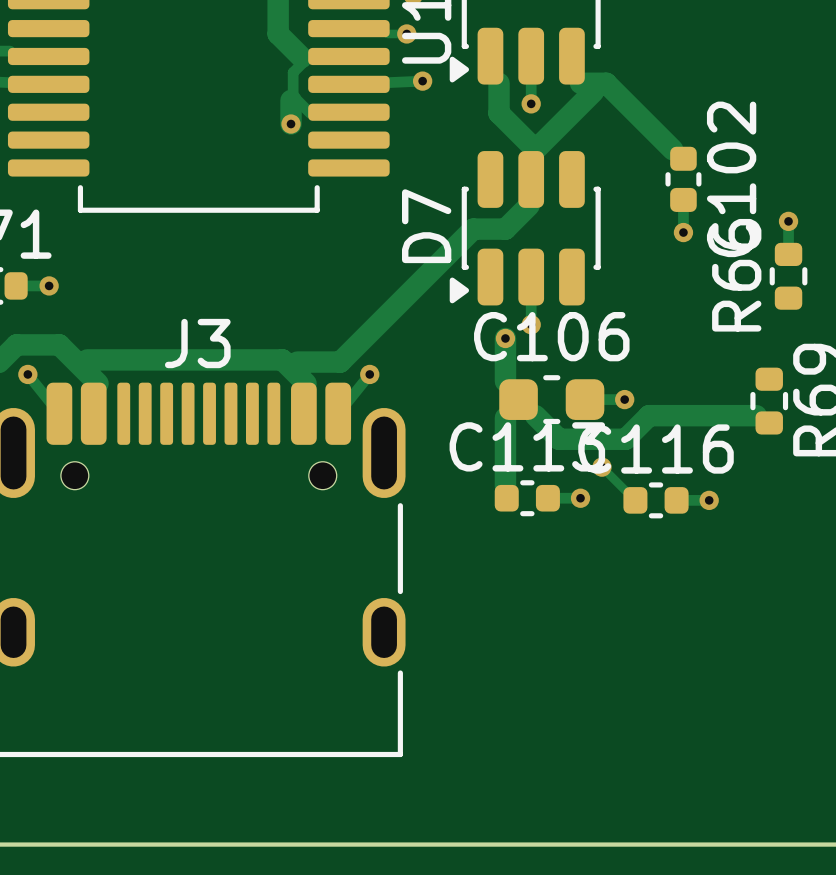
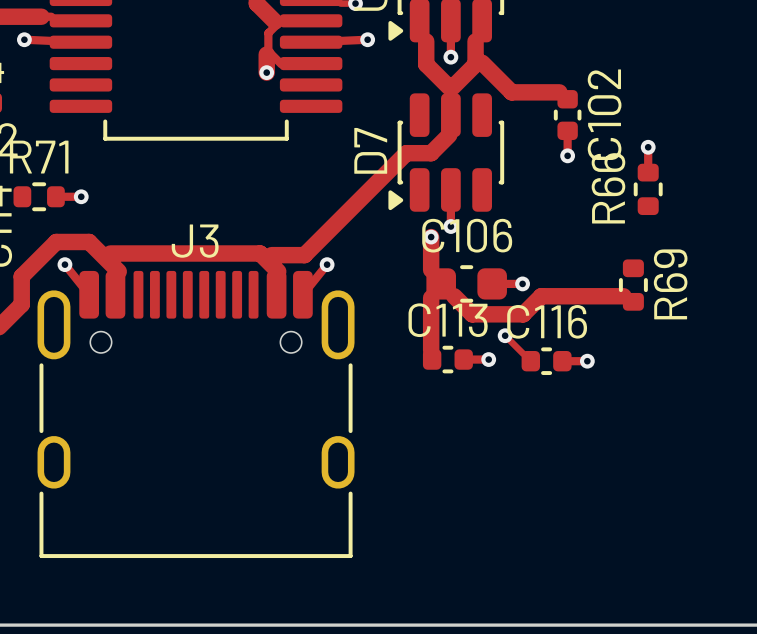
track: none -> (475, 41) (475, 64) (452, 87)
track: (580, 83) (606, 83) (672, 149) -> (482, 62) (511, 92) (559, 92)
track: (593, 91) (533, 151) -> none

